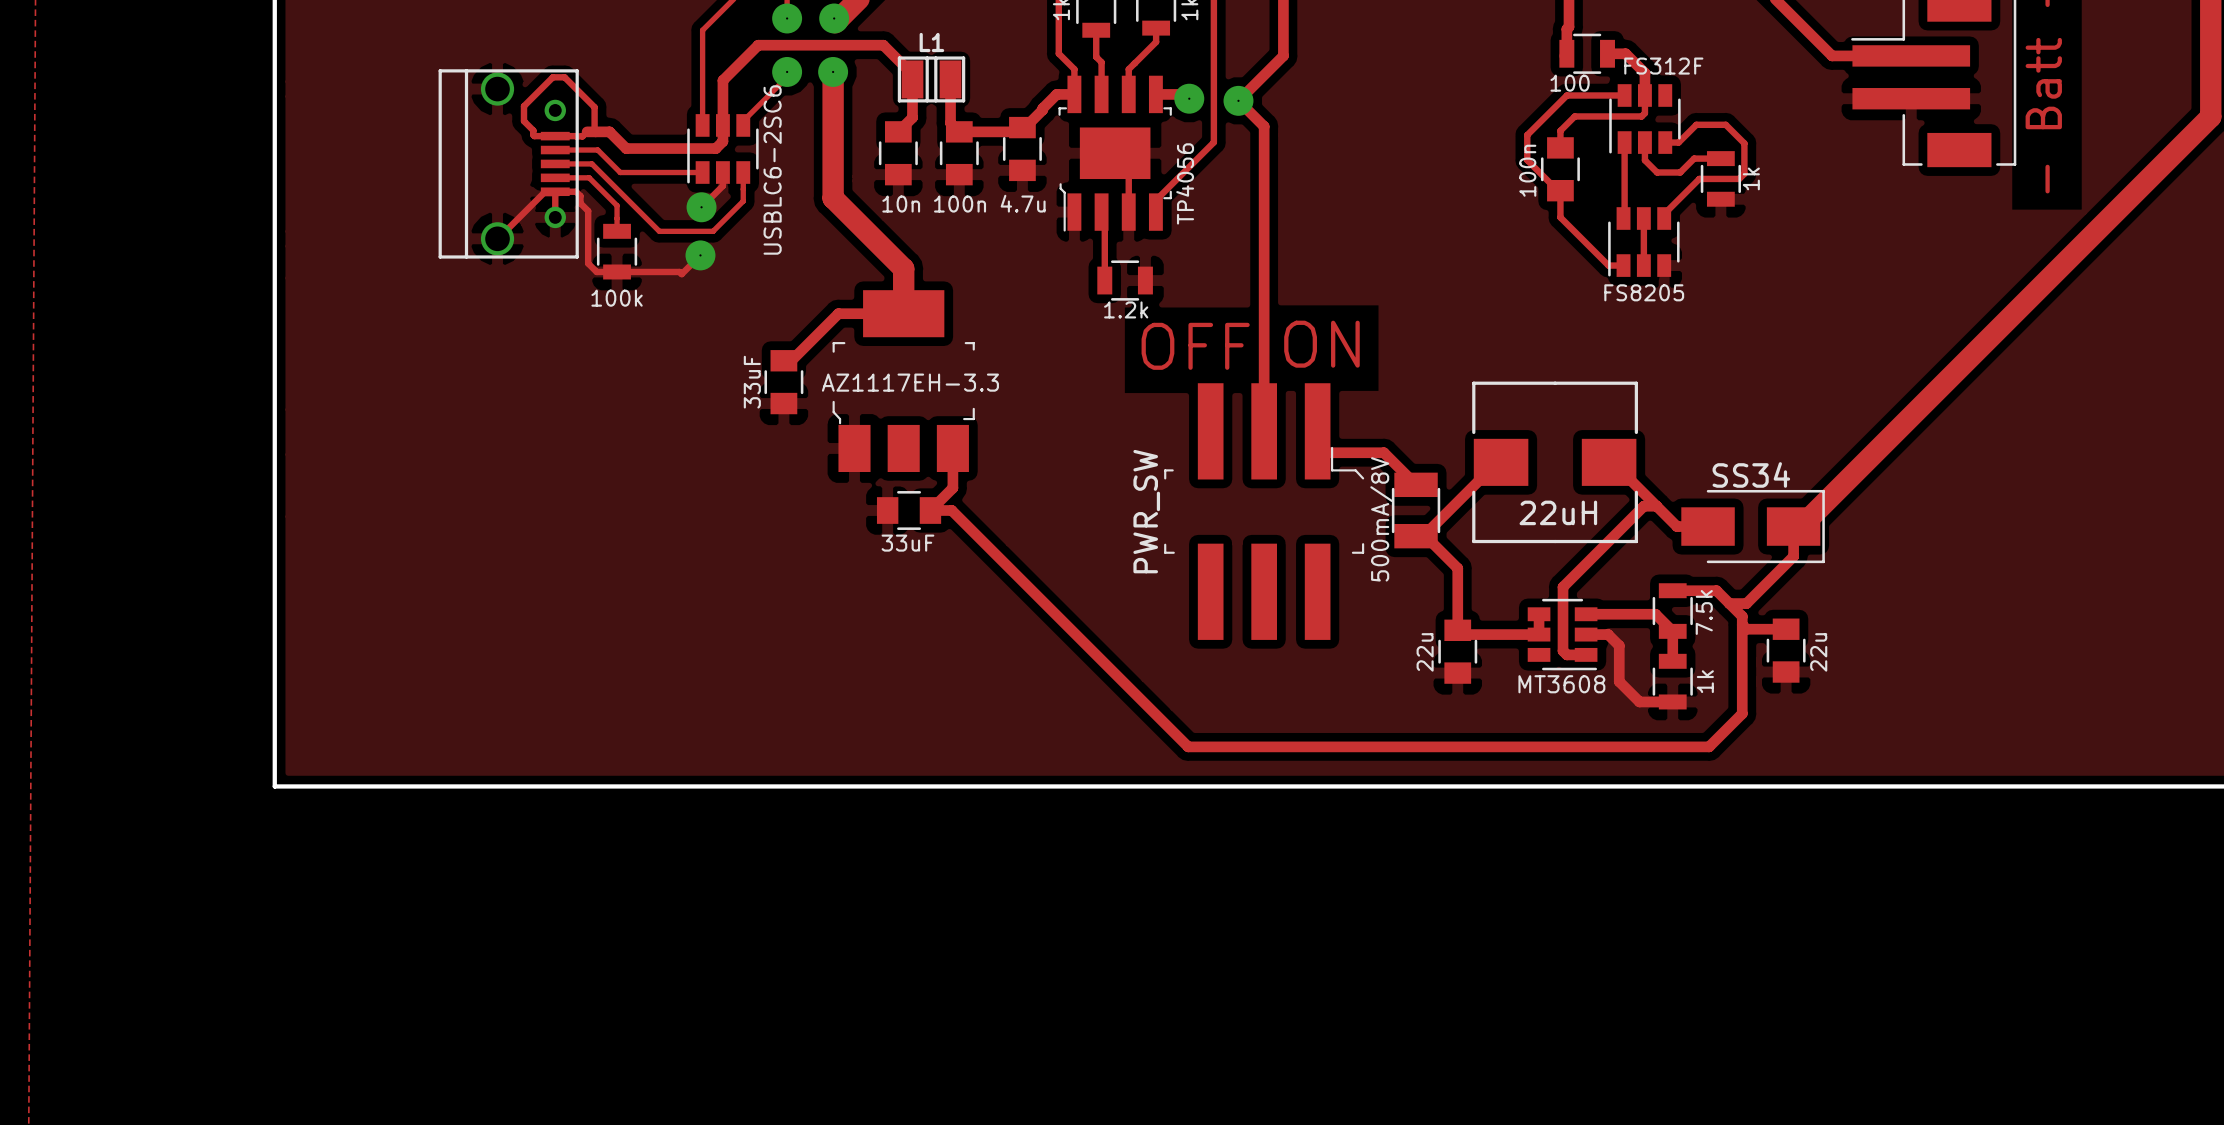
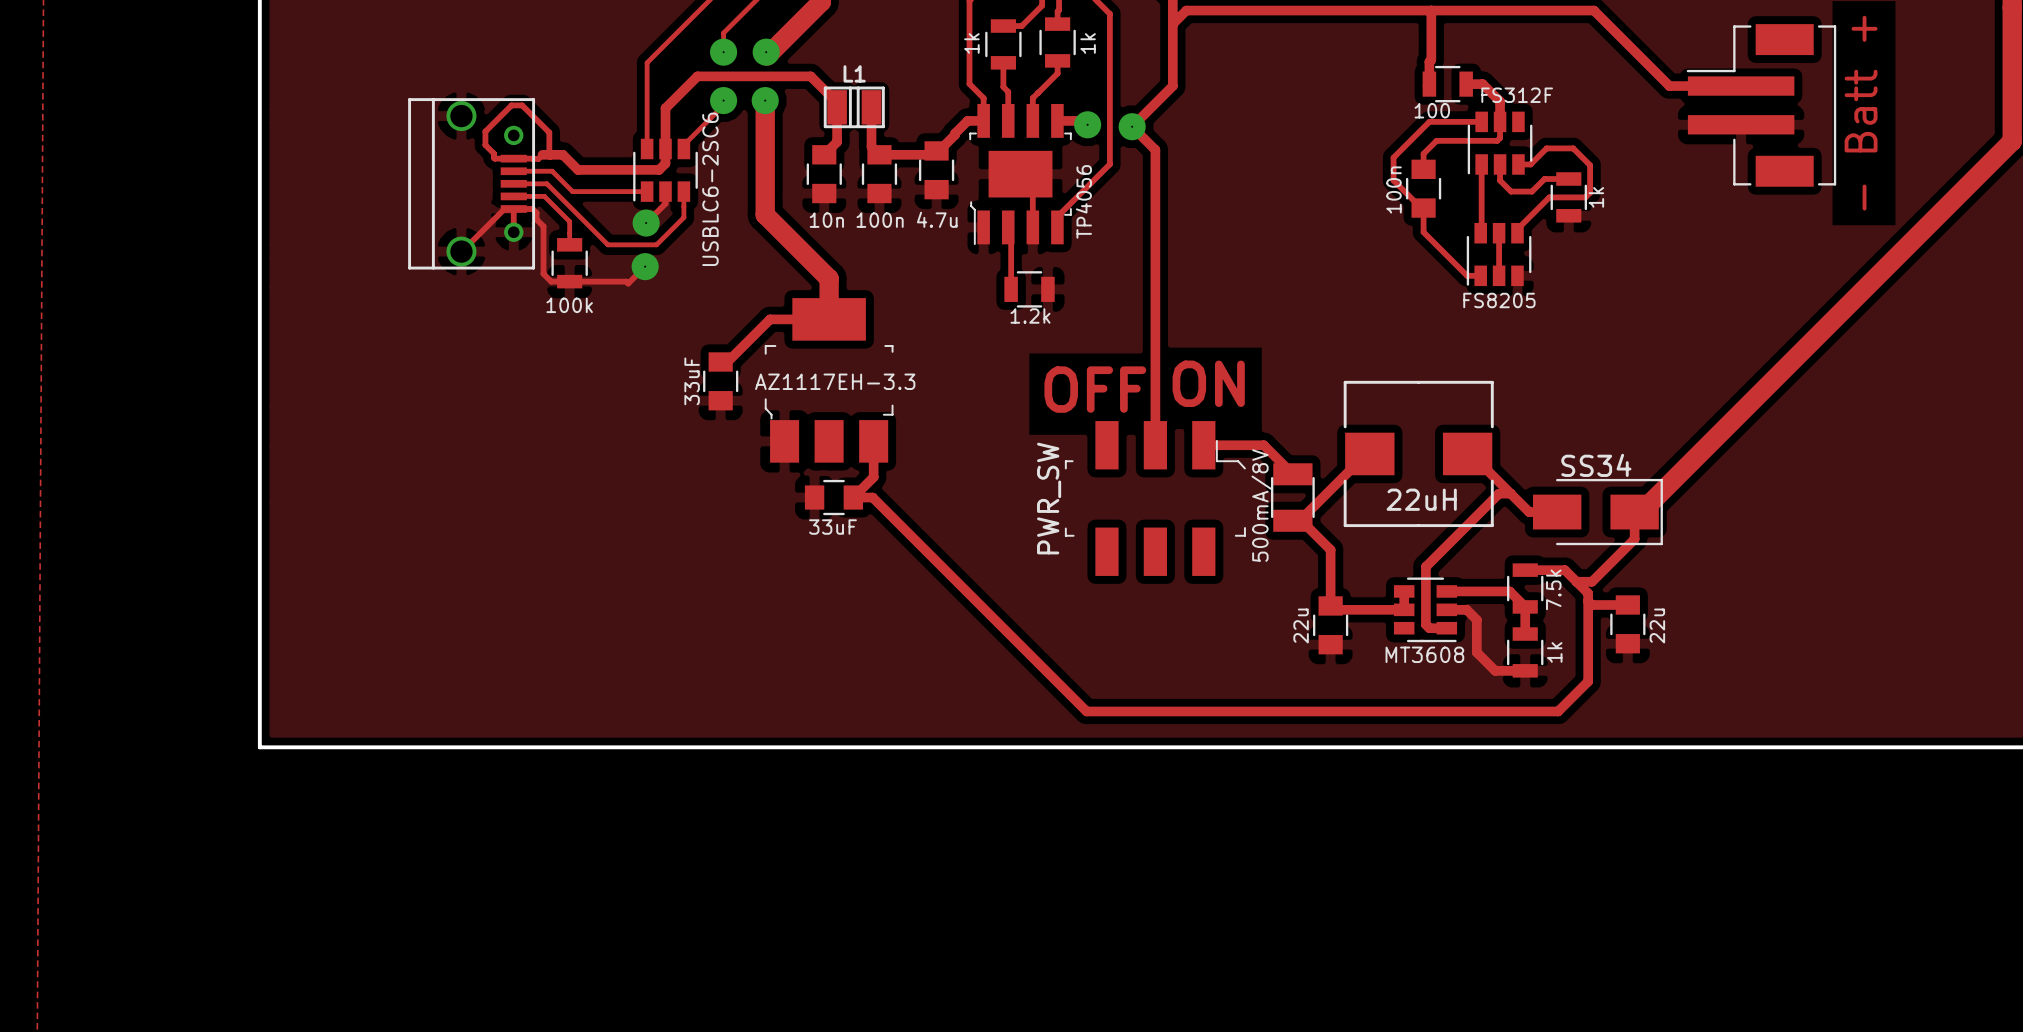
text position: ON (1321, 344) -> ON (1208, 383)
text position: OFF (1195, 346) -> OFF (1095, 389)
part footprint: [1164, 383, 1365, 640] -> [1064, 421, 1246, 576]

